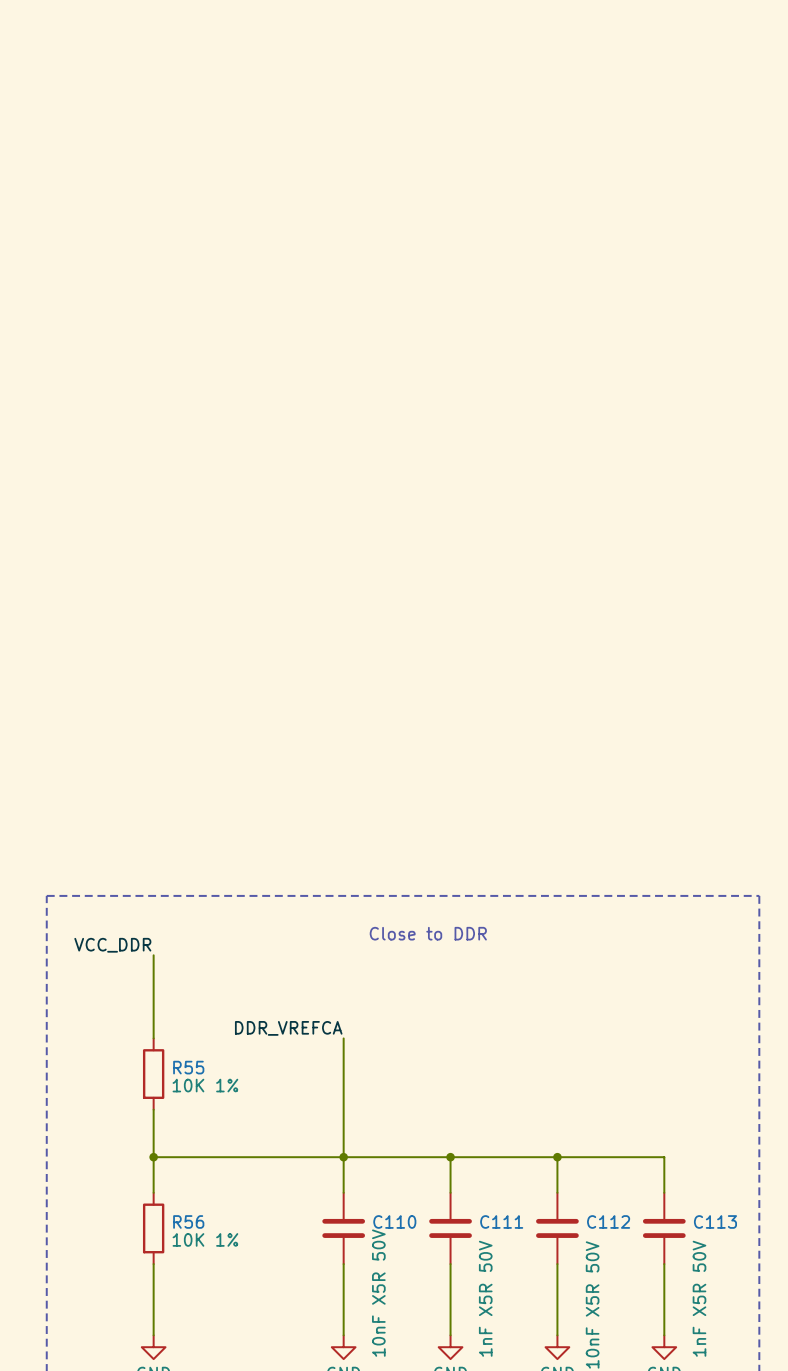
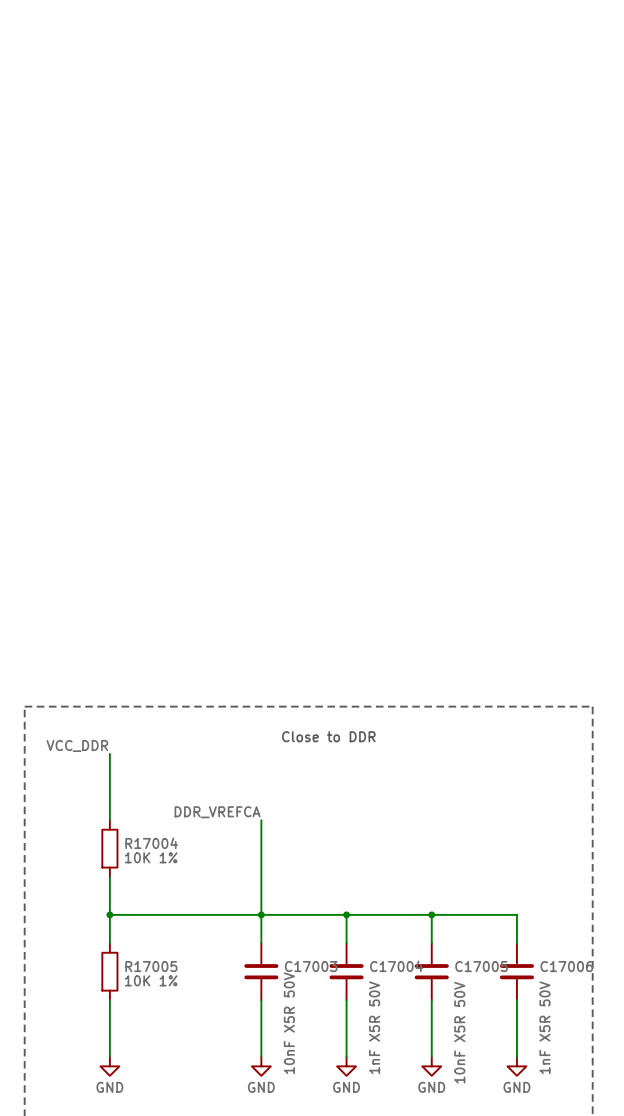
R55 name: R55 (188, 1067) -> R17004 (151, 843)
R56 name: R56 (188, 1221) -> R17005 (151, 966)
C110 name: C110 (394, 1221) -> C17003 (311, 966)
C111 name: C111 (501, 1221) -> C17004 (396, 966)
C112 name: C112 (608, 1221) -> C17005 (481, 966)
C113 name: C113 (715, 1221) -> C17006 (566, 966)

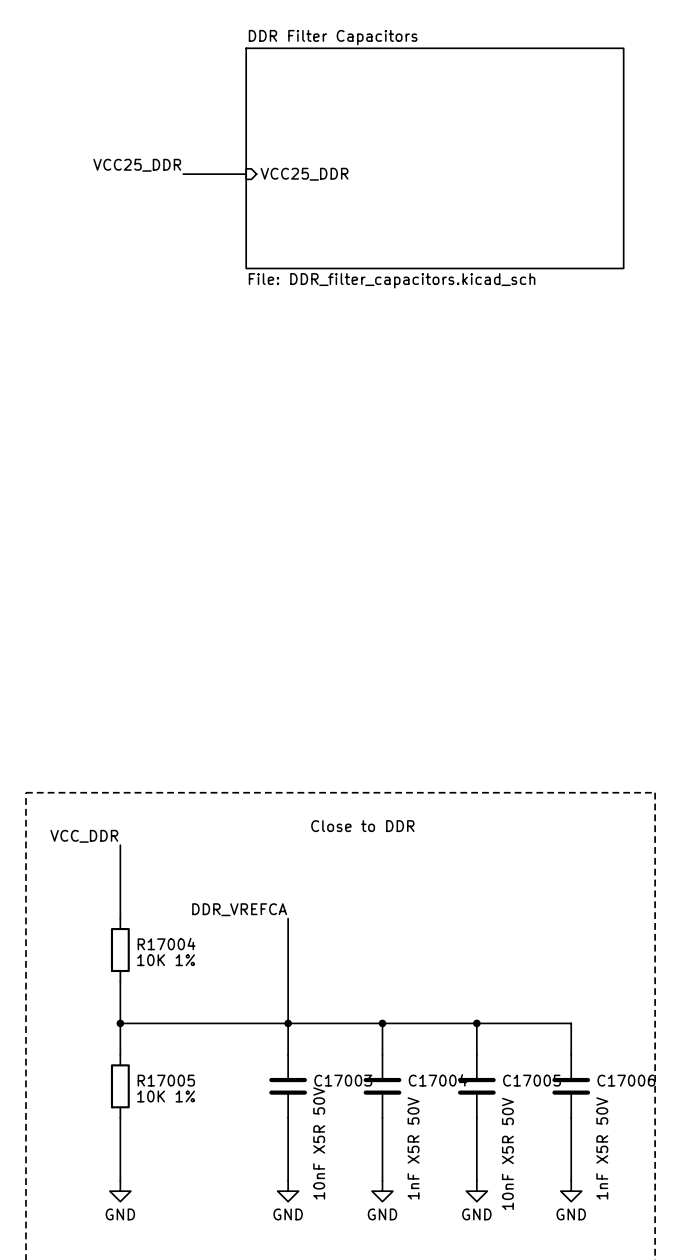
sheet DDR Filter Capacitors: none -> File: DDR_filter_capacitors.kicad_sch (434, 158)
label: none -> VCC25_DDR (137, 165)
wire: none -> (183, 174) (246, 174)
sheet pin: none -> VCC25_DDR (304, 174)

